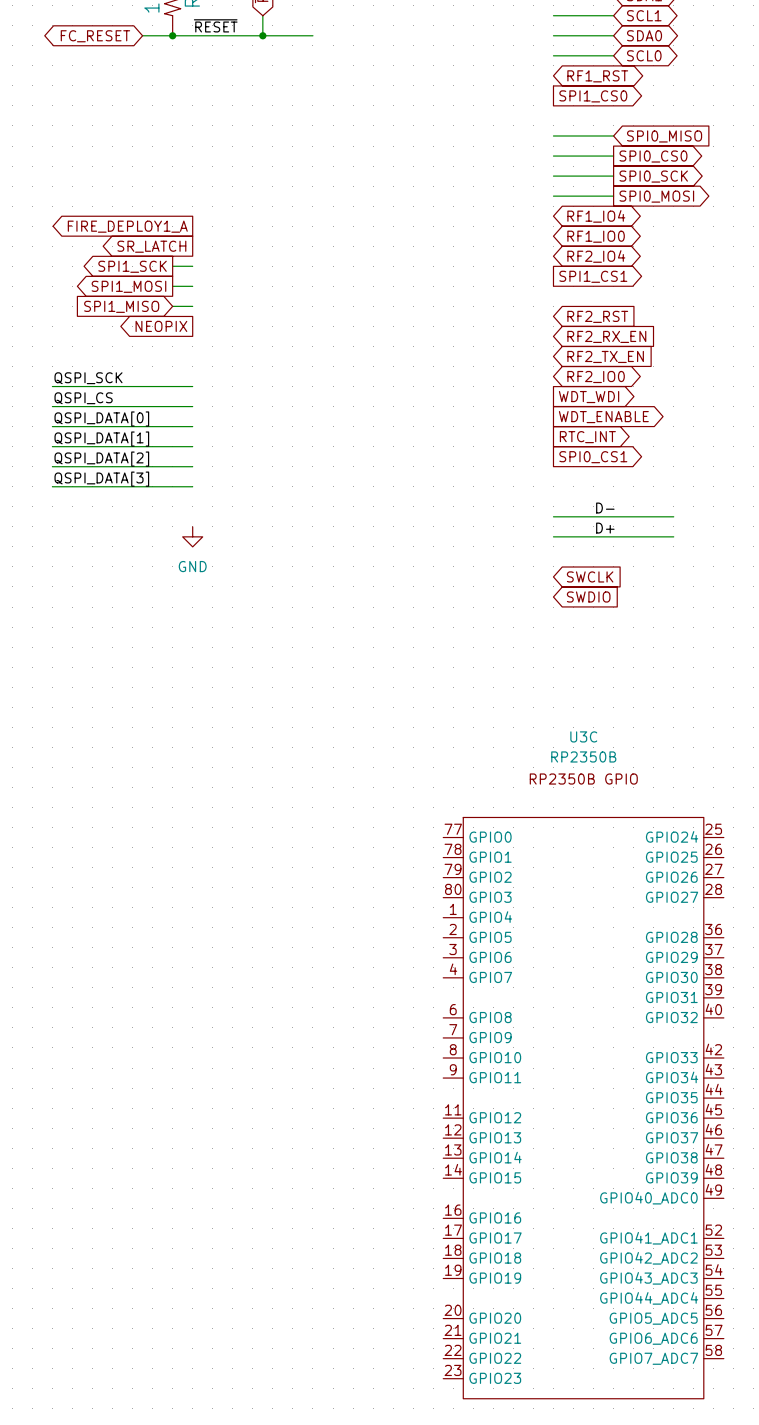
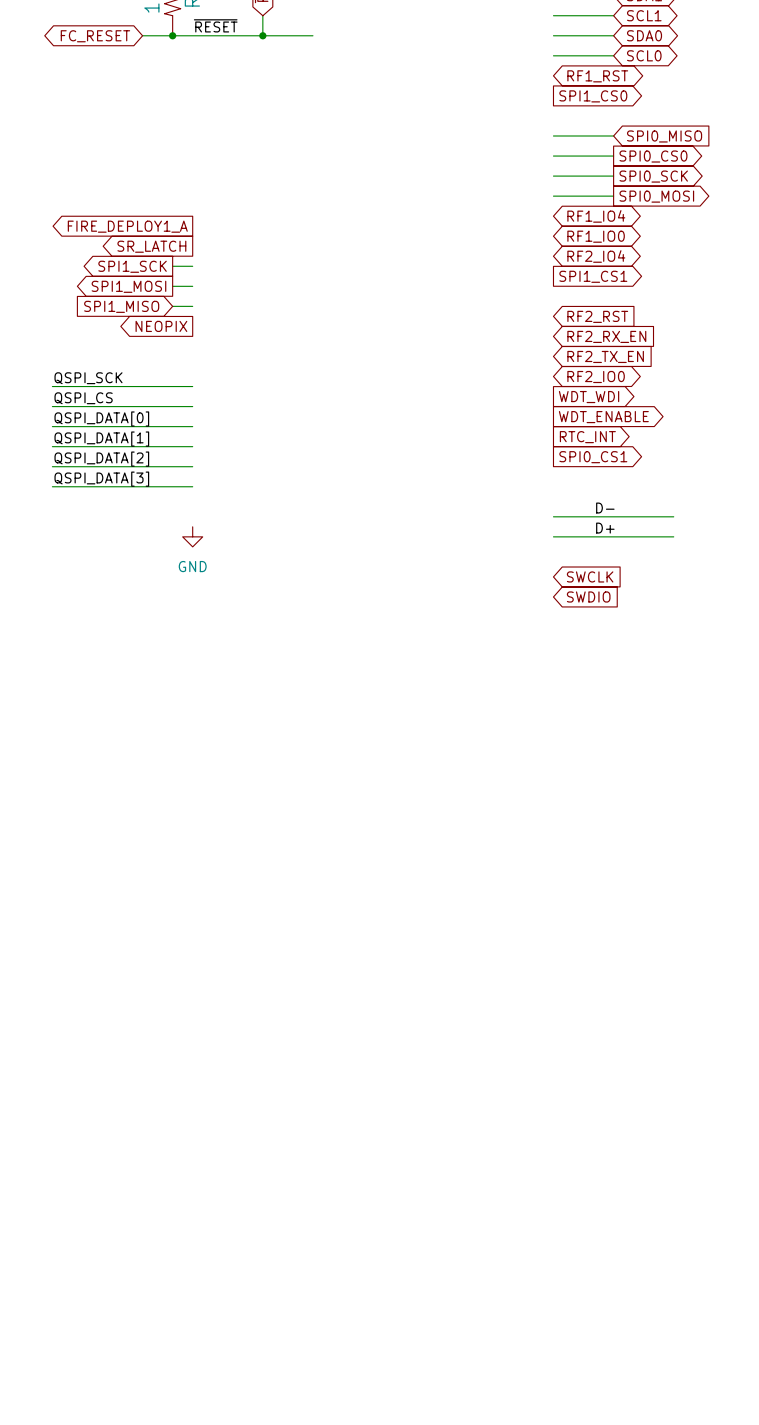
U3C: RP2350B (583, 1108) -> none

